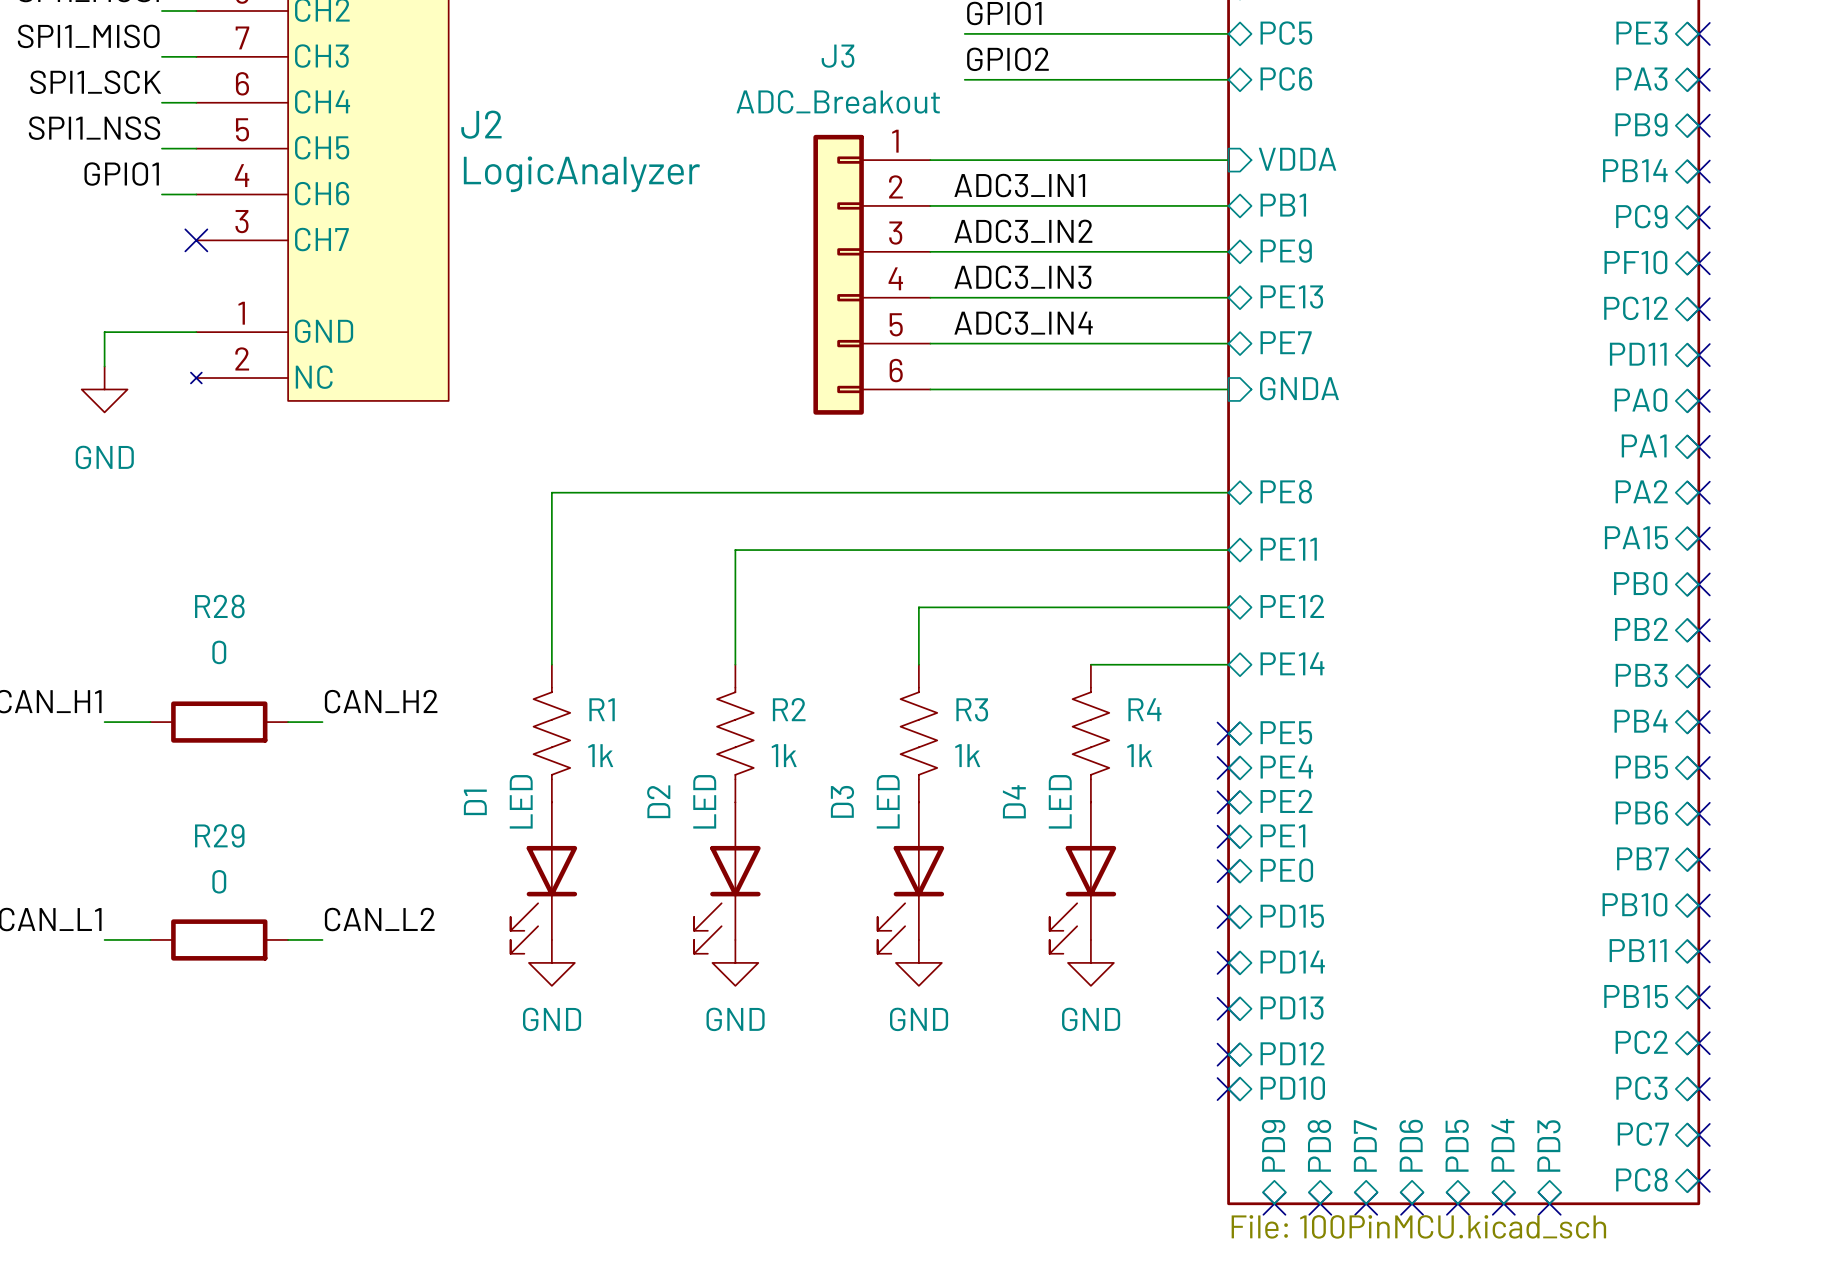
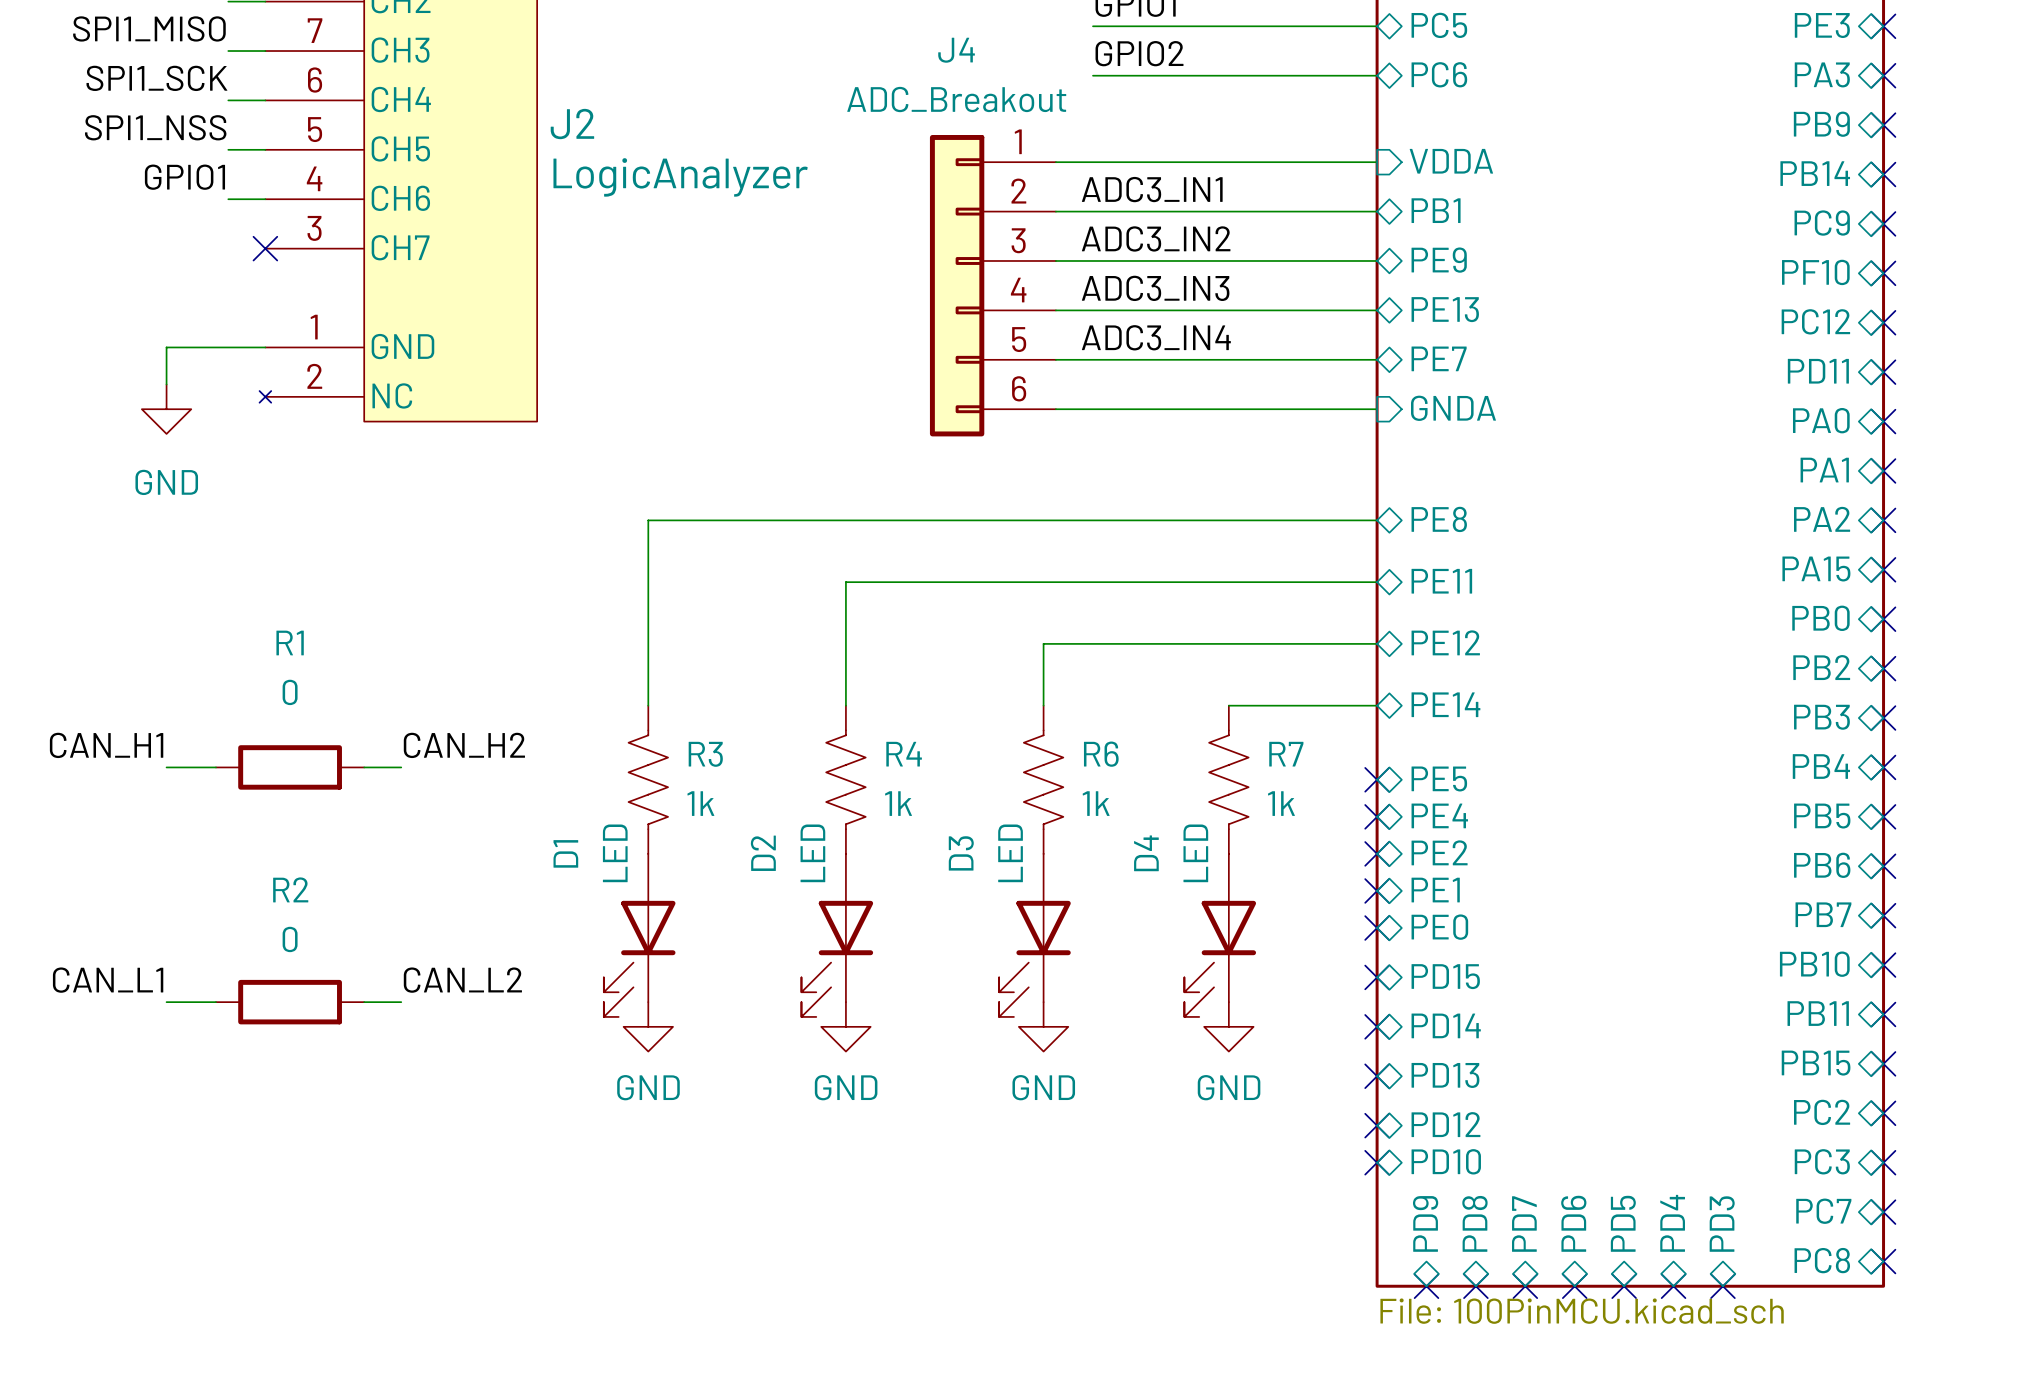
J3 name: J3 (838, 56) -> J4 (956, 50)
R28 name: R28 (219, 606) -> R1 (290, 642)
R1 name: R1 (602, 709) -> R3 (705, 754)
R2 name: R2 (789, 709) -> R4 (904, 754)
R3 name: R3 (972, 709) -> R6 (1101, 754)
R4 name: R4 (1144, 709) -> R7 (1286, 754)
R29 name: R29 (219, 835) -> R2 (290, 889)

